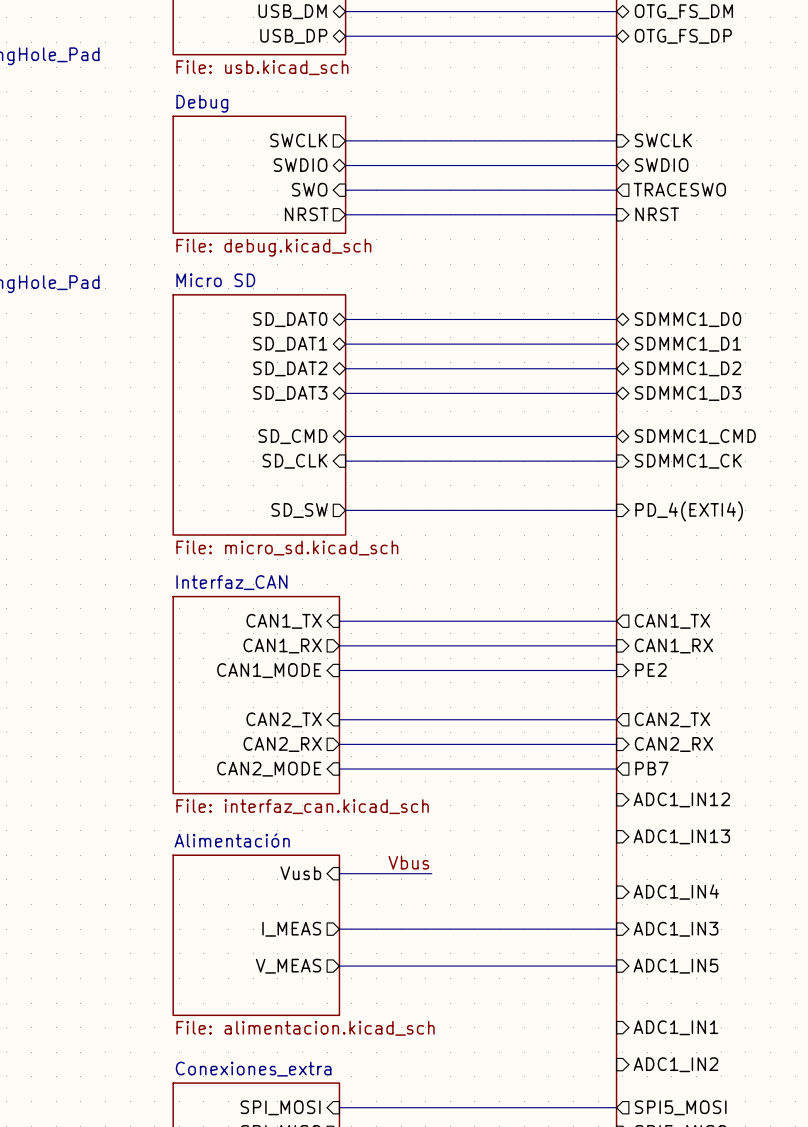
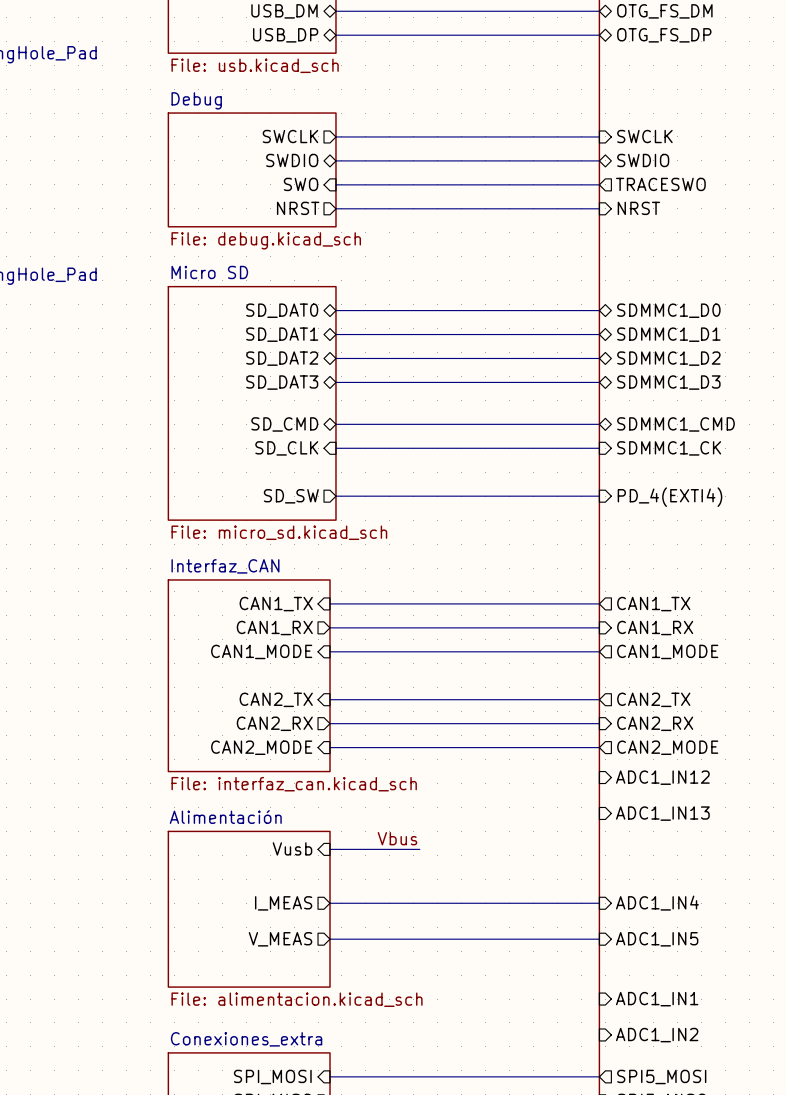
sheet pin shape: input (651, 670) -> output (667, 651)
sheet pin: PE2 (651, 670) -> CAN1_MODE (667, 651)
sheet pin: PB7 (651, 768) -> CAN2_MODE (667, 747)
sheet pin: ADC1_IN4 (676, 892) -> none
sheet pin: ADC1_IN3 (675, 929) -> ADC1_IN4 (657, 903)

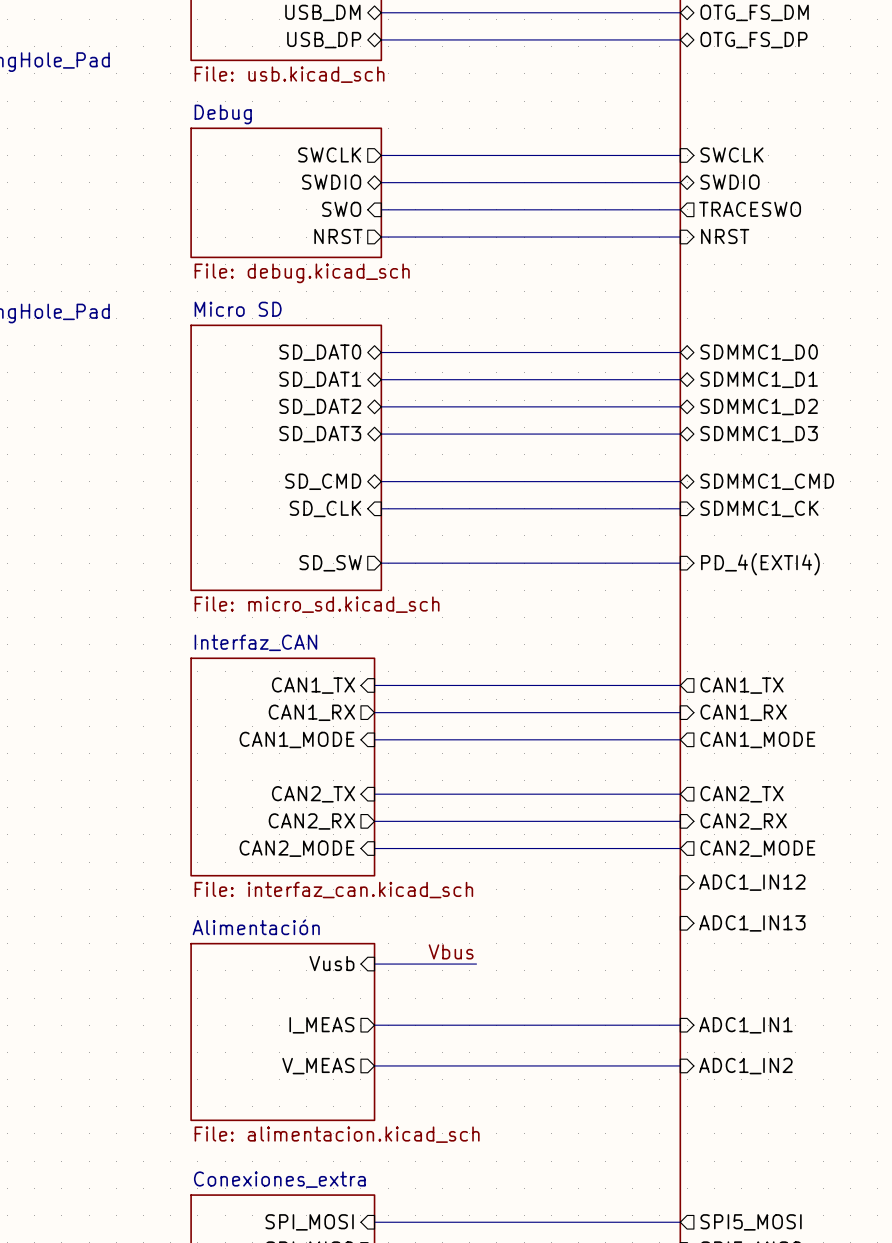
sheet pin: ADC1_IN4 (657, 903) -> ADC1_IN1 (745, 1025)
sheet pin: ADC1_IN5 (657, 939) -> ADC1_IN2 (745, 1066)
sheet pin: ADC1_IN1 (657, 999) -> none
sheet pin: ADC1_IN2 (657, 1035) -> none

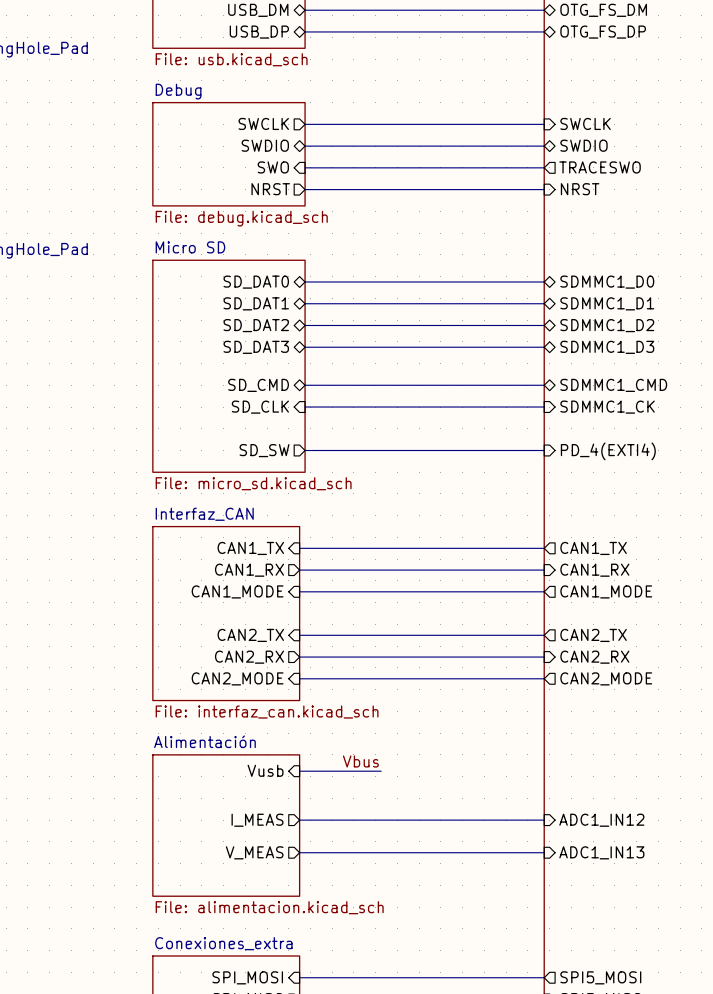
sheet pin: ADC1_IN12 (752, 882) -> none
sheet pin: ADC1_IN13 (752, 923) -> none
sheet pin: ADC1_IN1 (745, 1025) -> ADC1_IN12 (601, 820)
sheet pin: ADC1_IN2 (745, 1066) -> ADC1_IN13 (601, 852)

